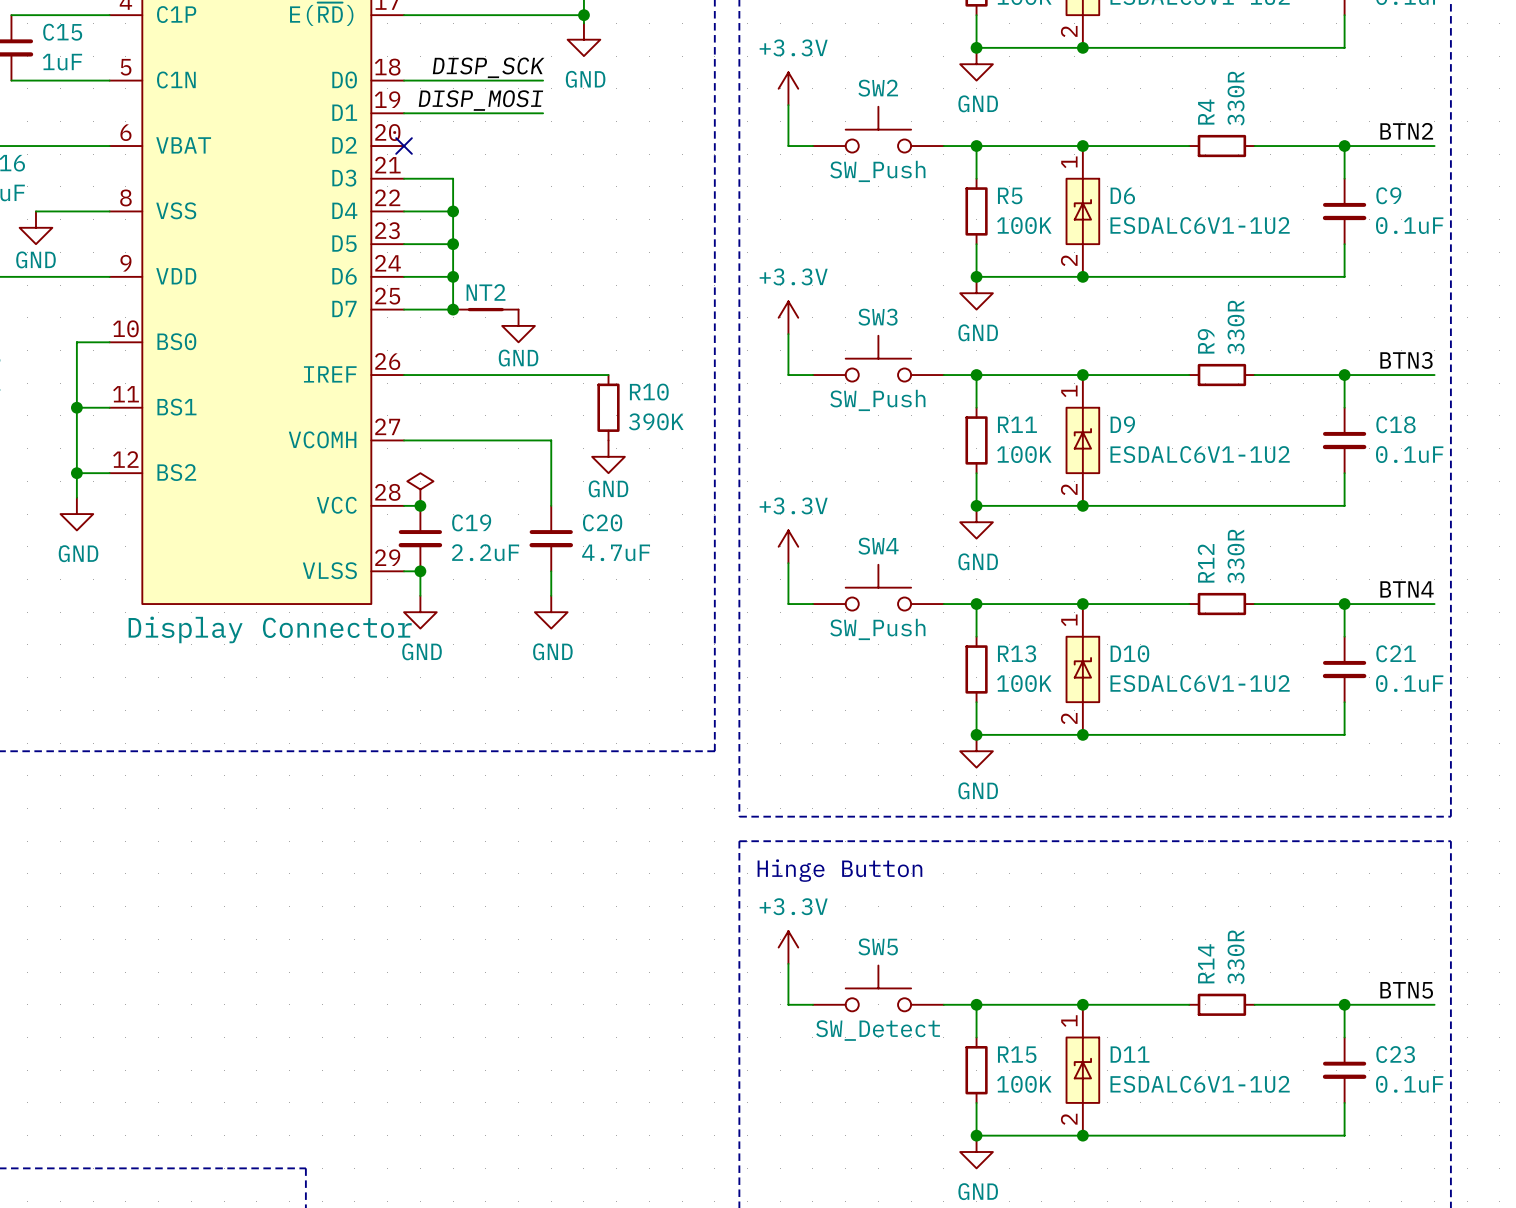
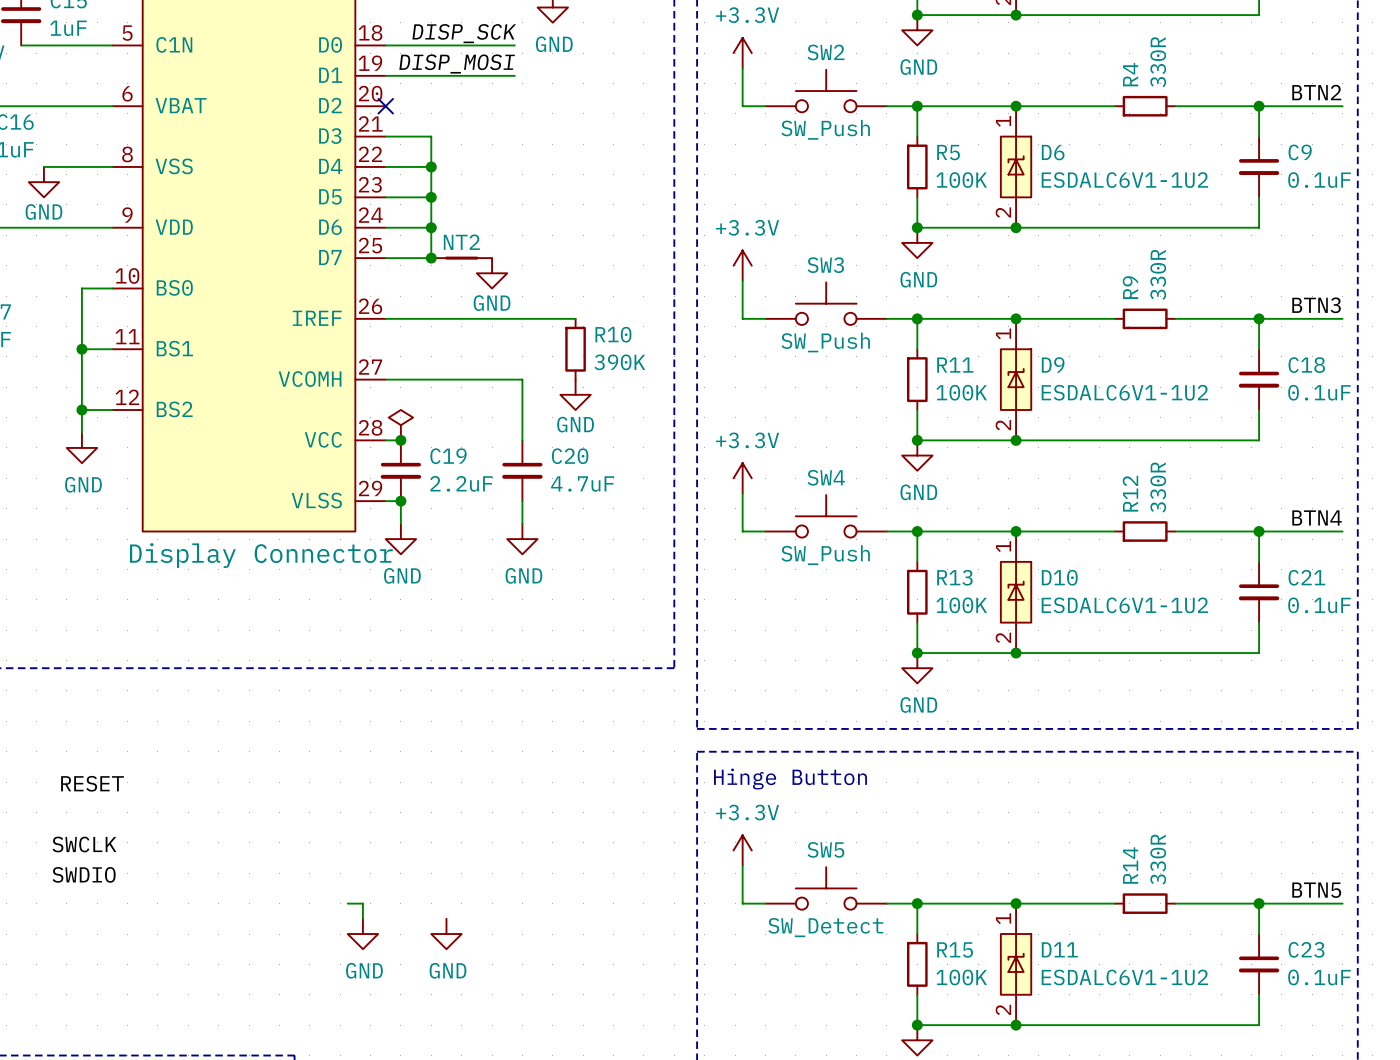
label: none -> RESET (92, 783)
label: none -> SWCLK (84, 844)
label: none -> SWDIO (84, 874)
wire: none -> (347, 903) (362, 903) (362, 918)
power symbol: none -> GND (362, 934)
power symbol: none -> GND (446, 934)

